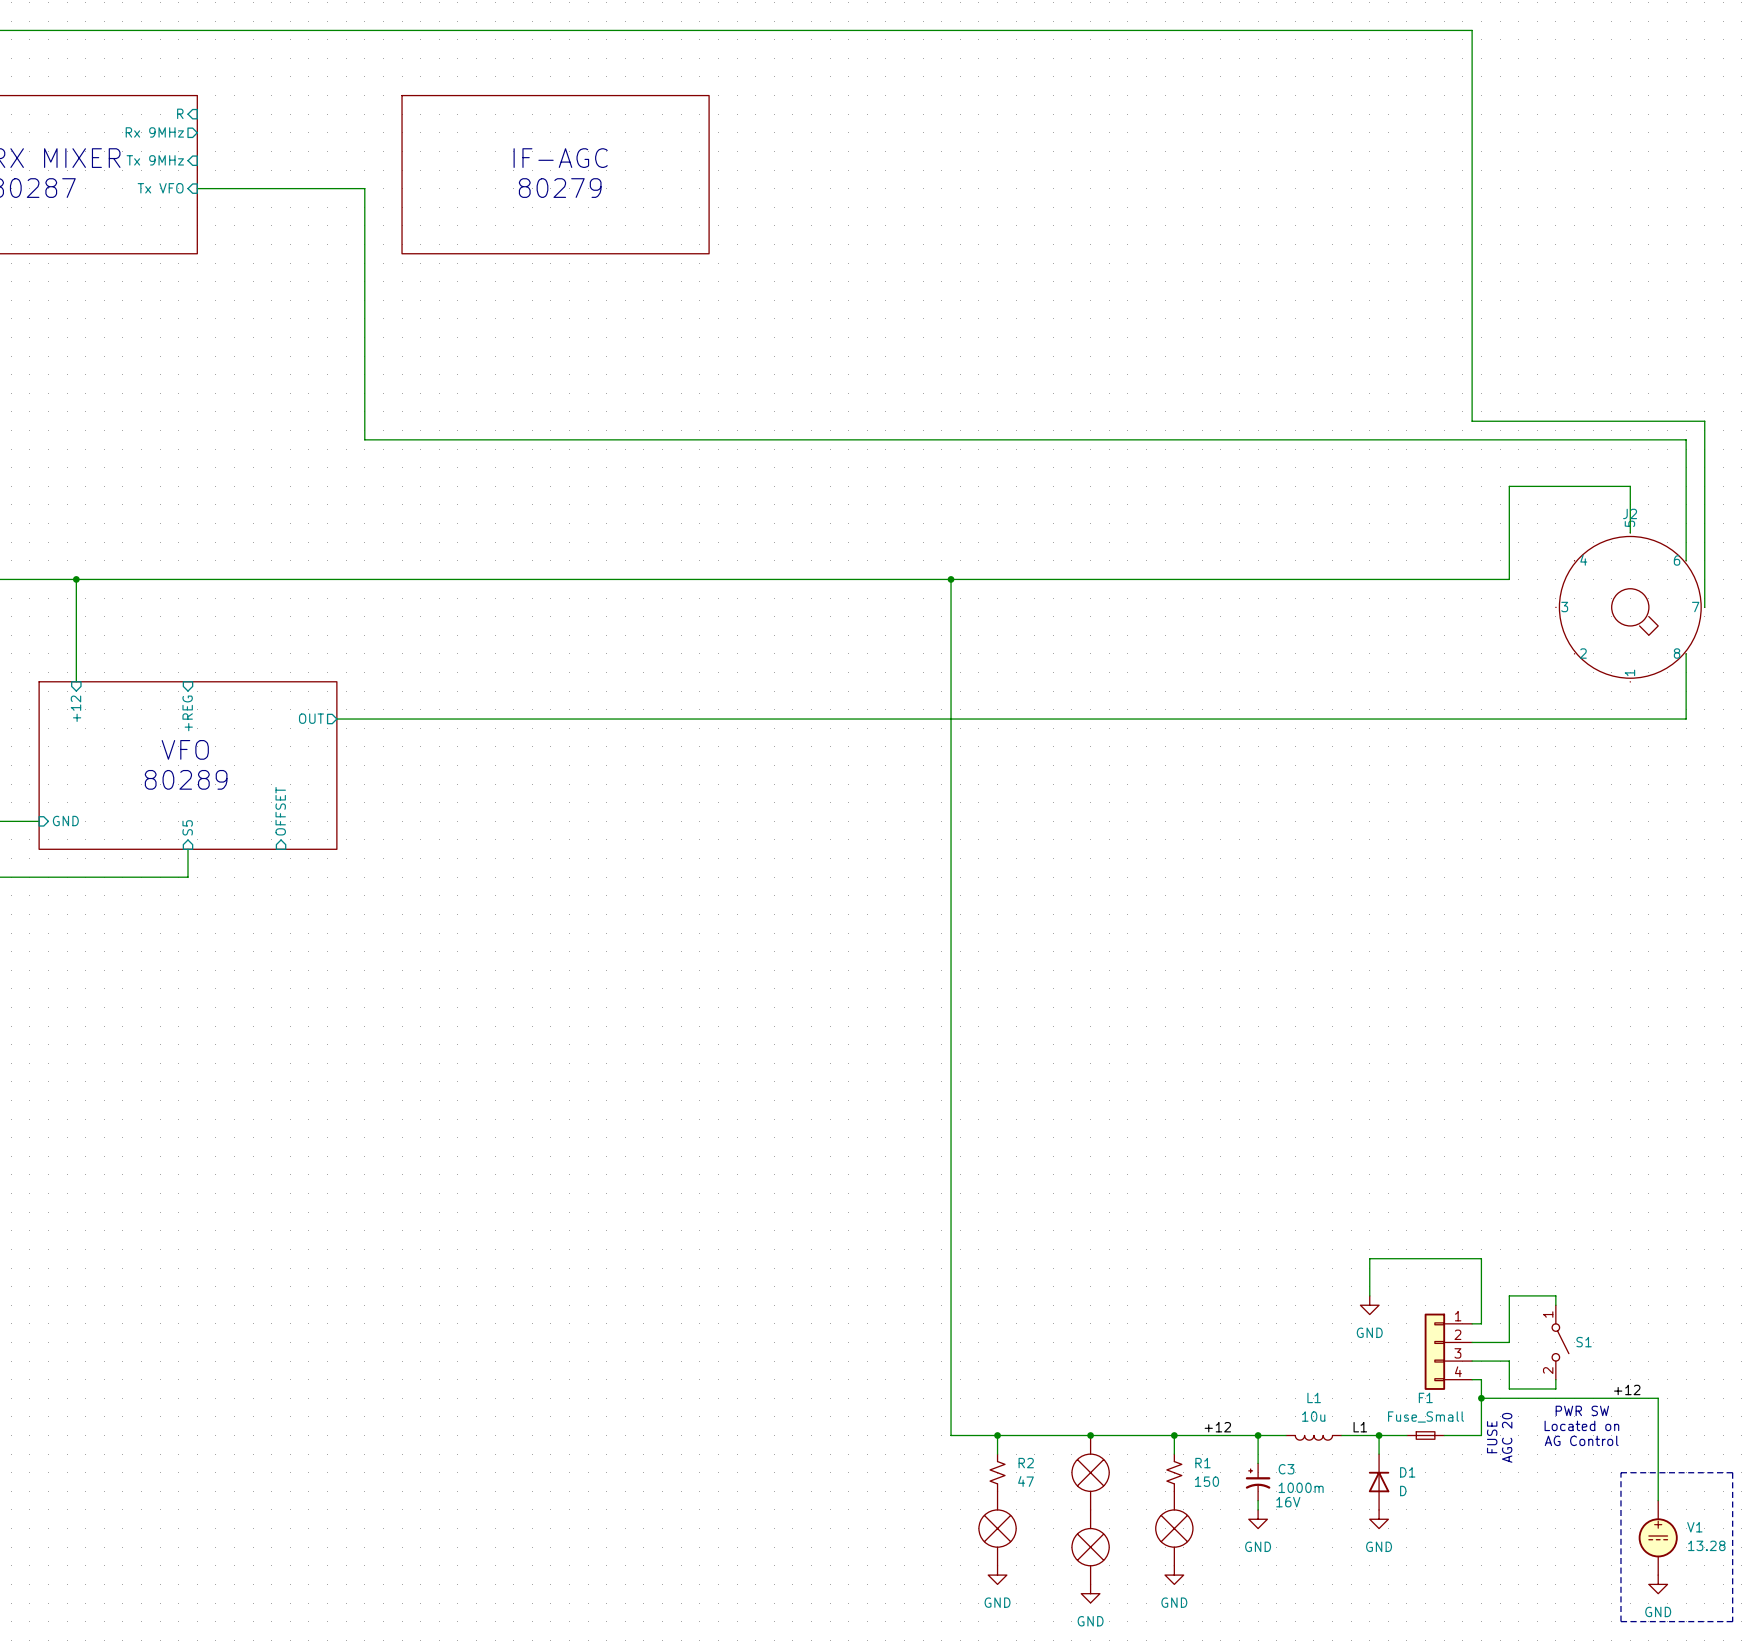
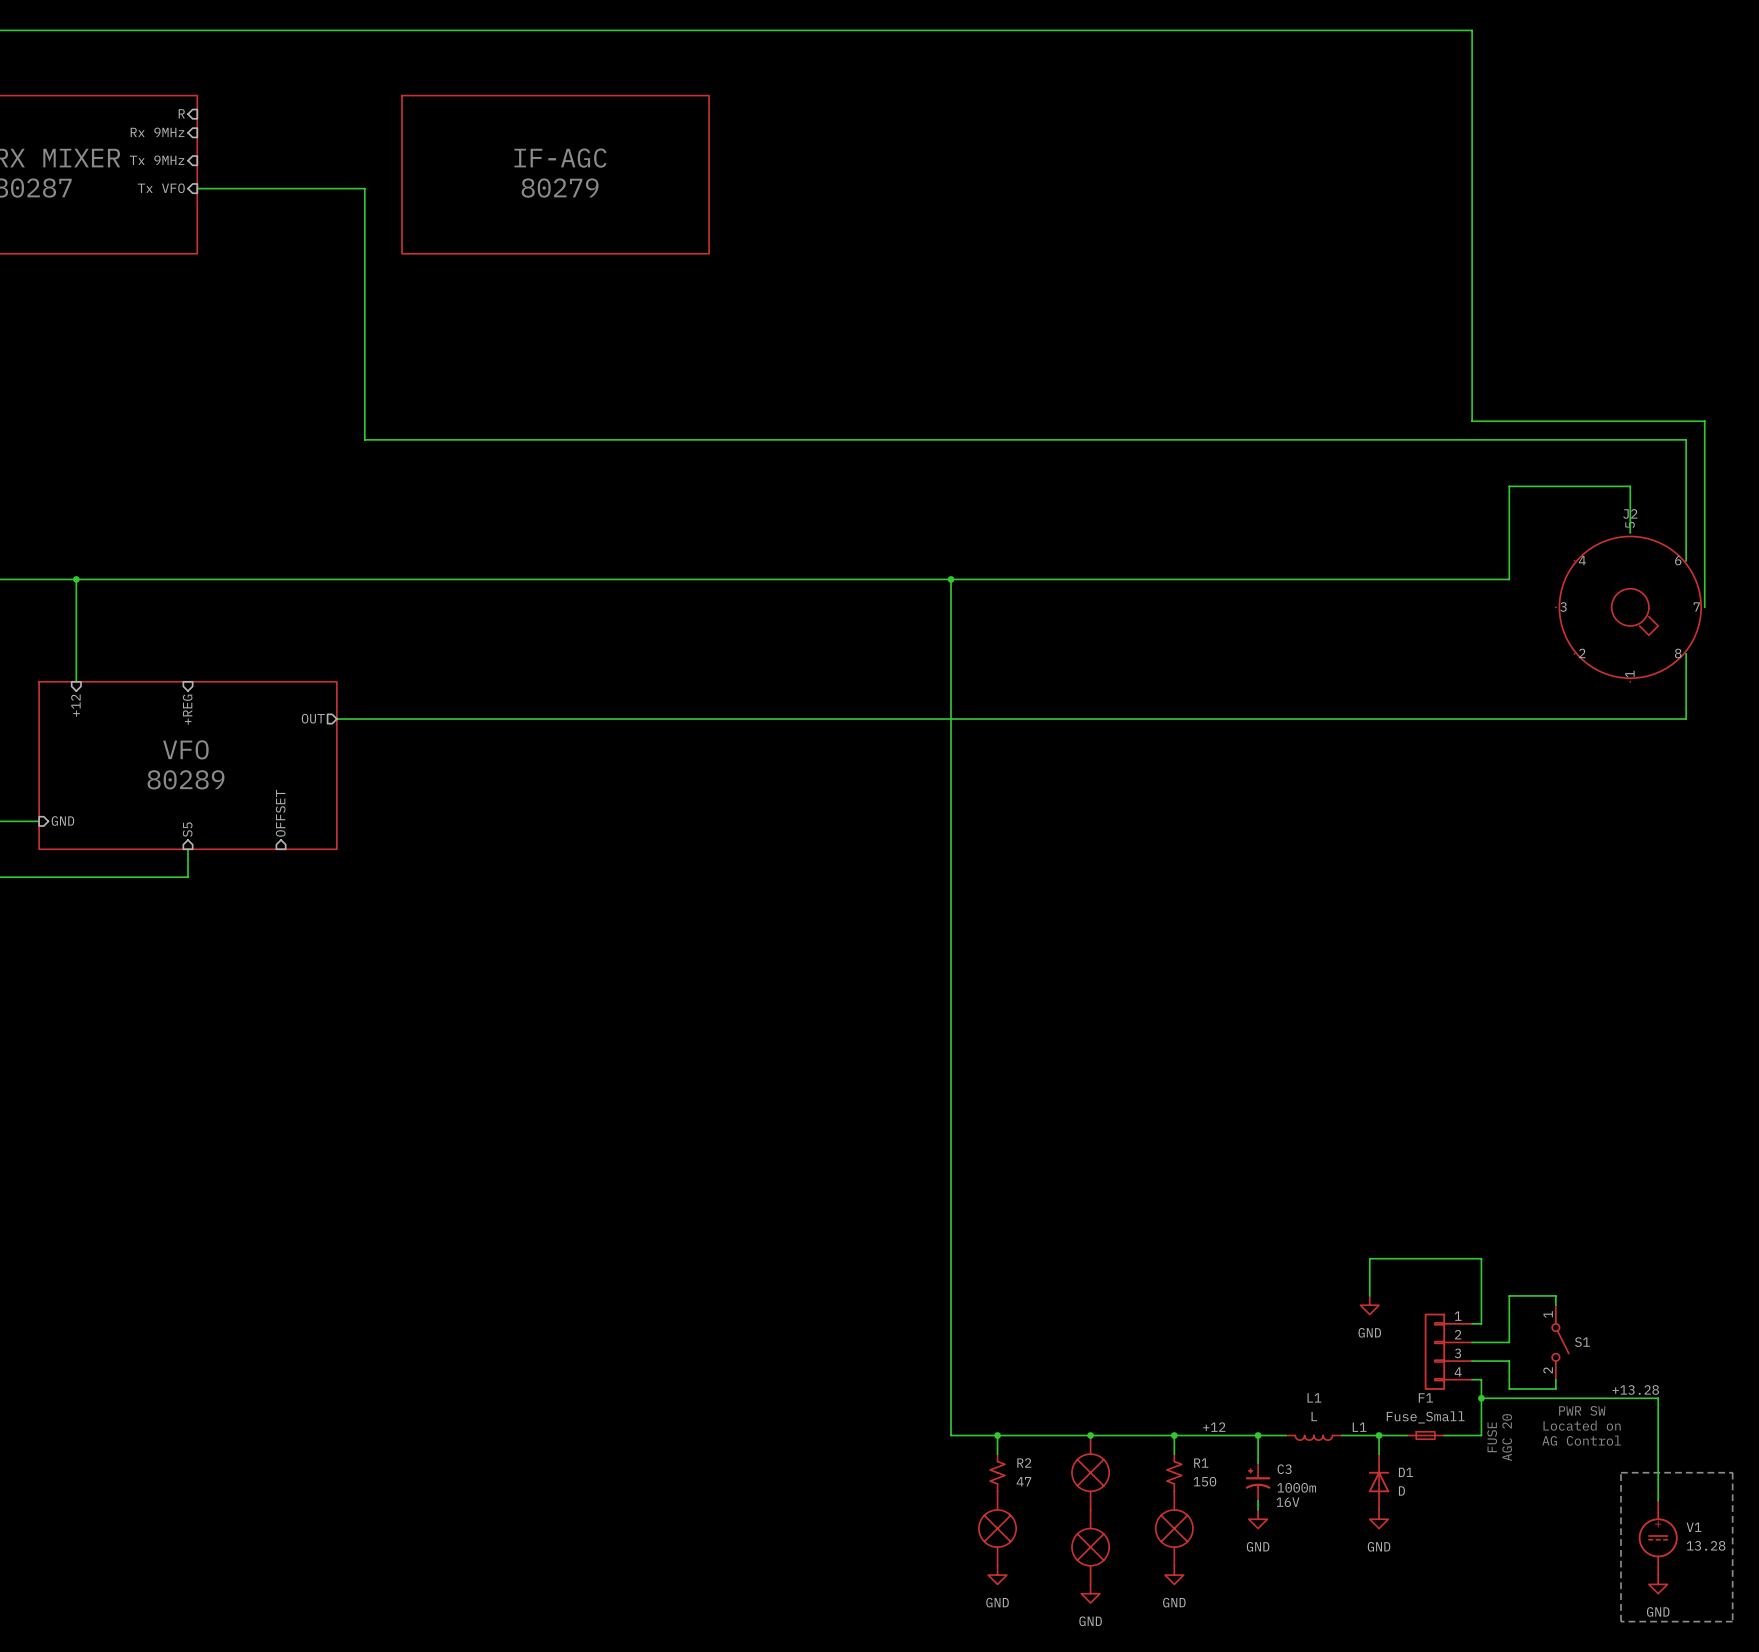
sheet pin shape: output (154, 132) -> input (157, 132)
label: +12 (1627, 1389) -> +13.28 (1635, 1389)
L1 value: 10u (1313, 1416) -> L (1314, 1416)

